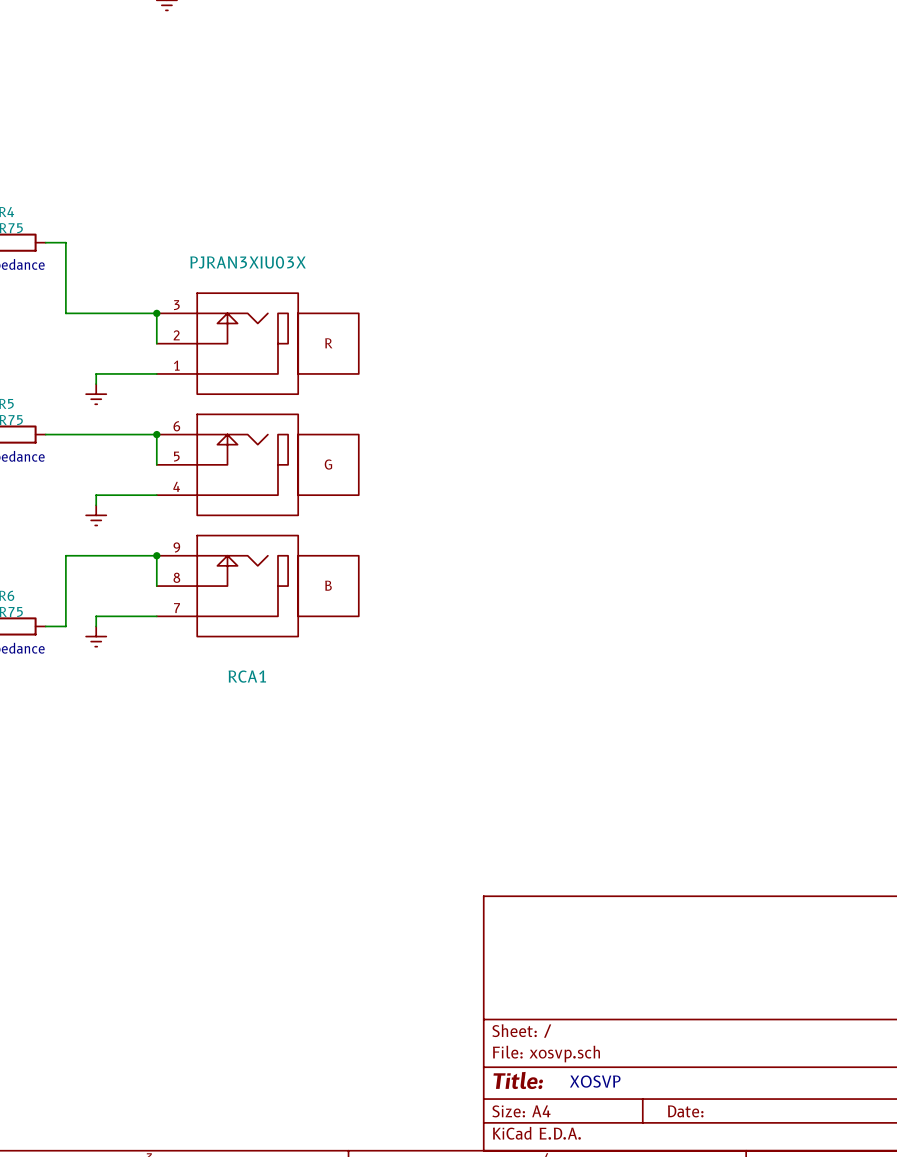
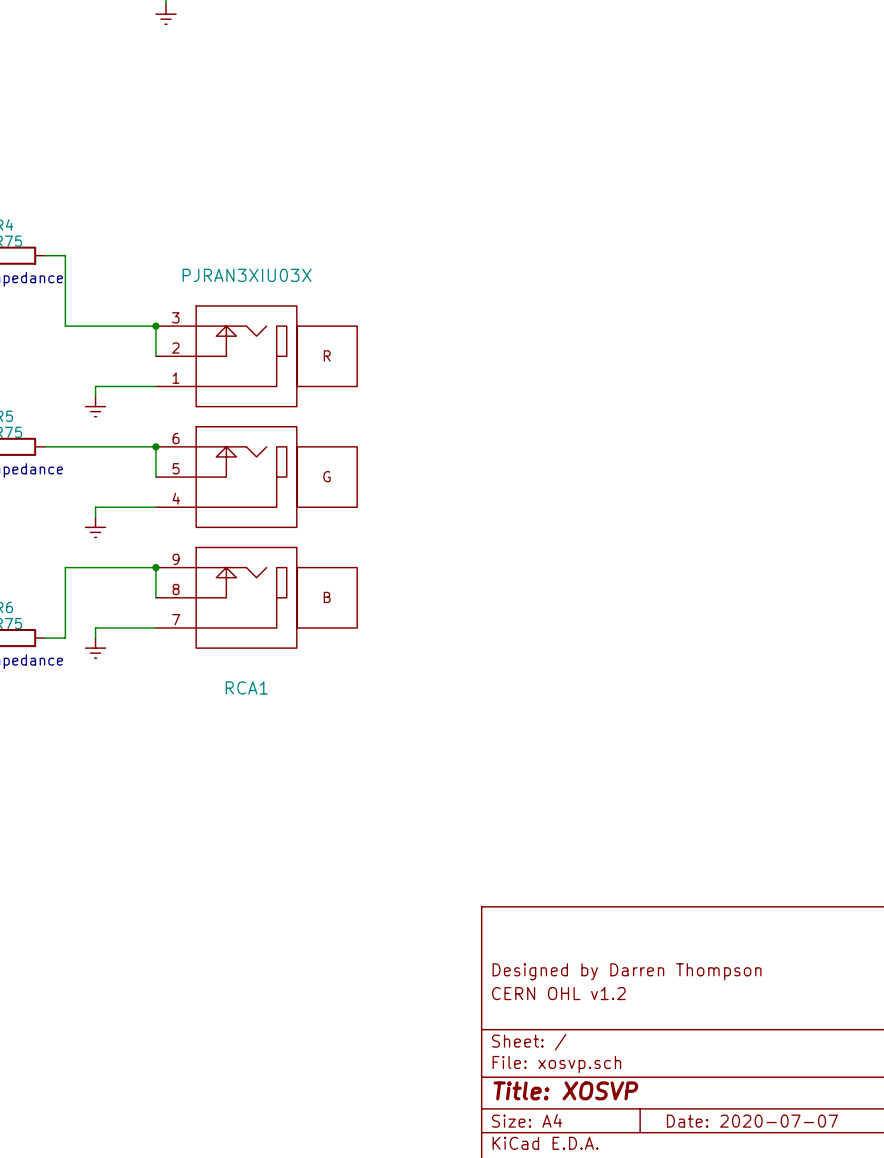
title block: none -> Designed by Darren Thompson (627, 971)
title block: none -> CERN OHL v1.2 (558, 993)
title block: Title: (518, 1080) -> Title: XOSVP (565, 1090)
text: XOSVP (595, 1081) -> none
title block: Date: (685, 1111) -> Date: 2020-07-07 (752, 1121)

